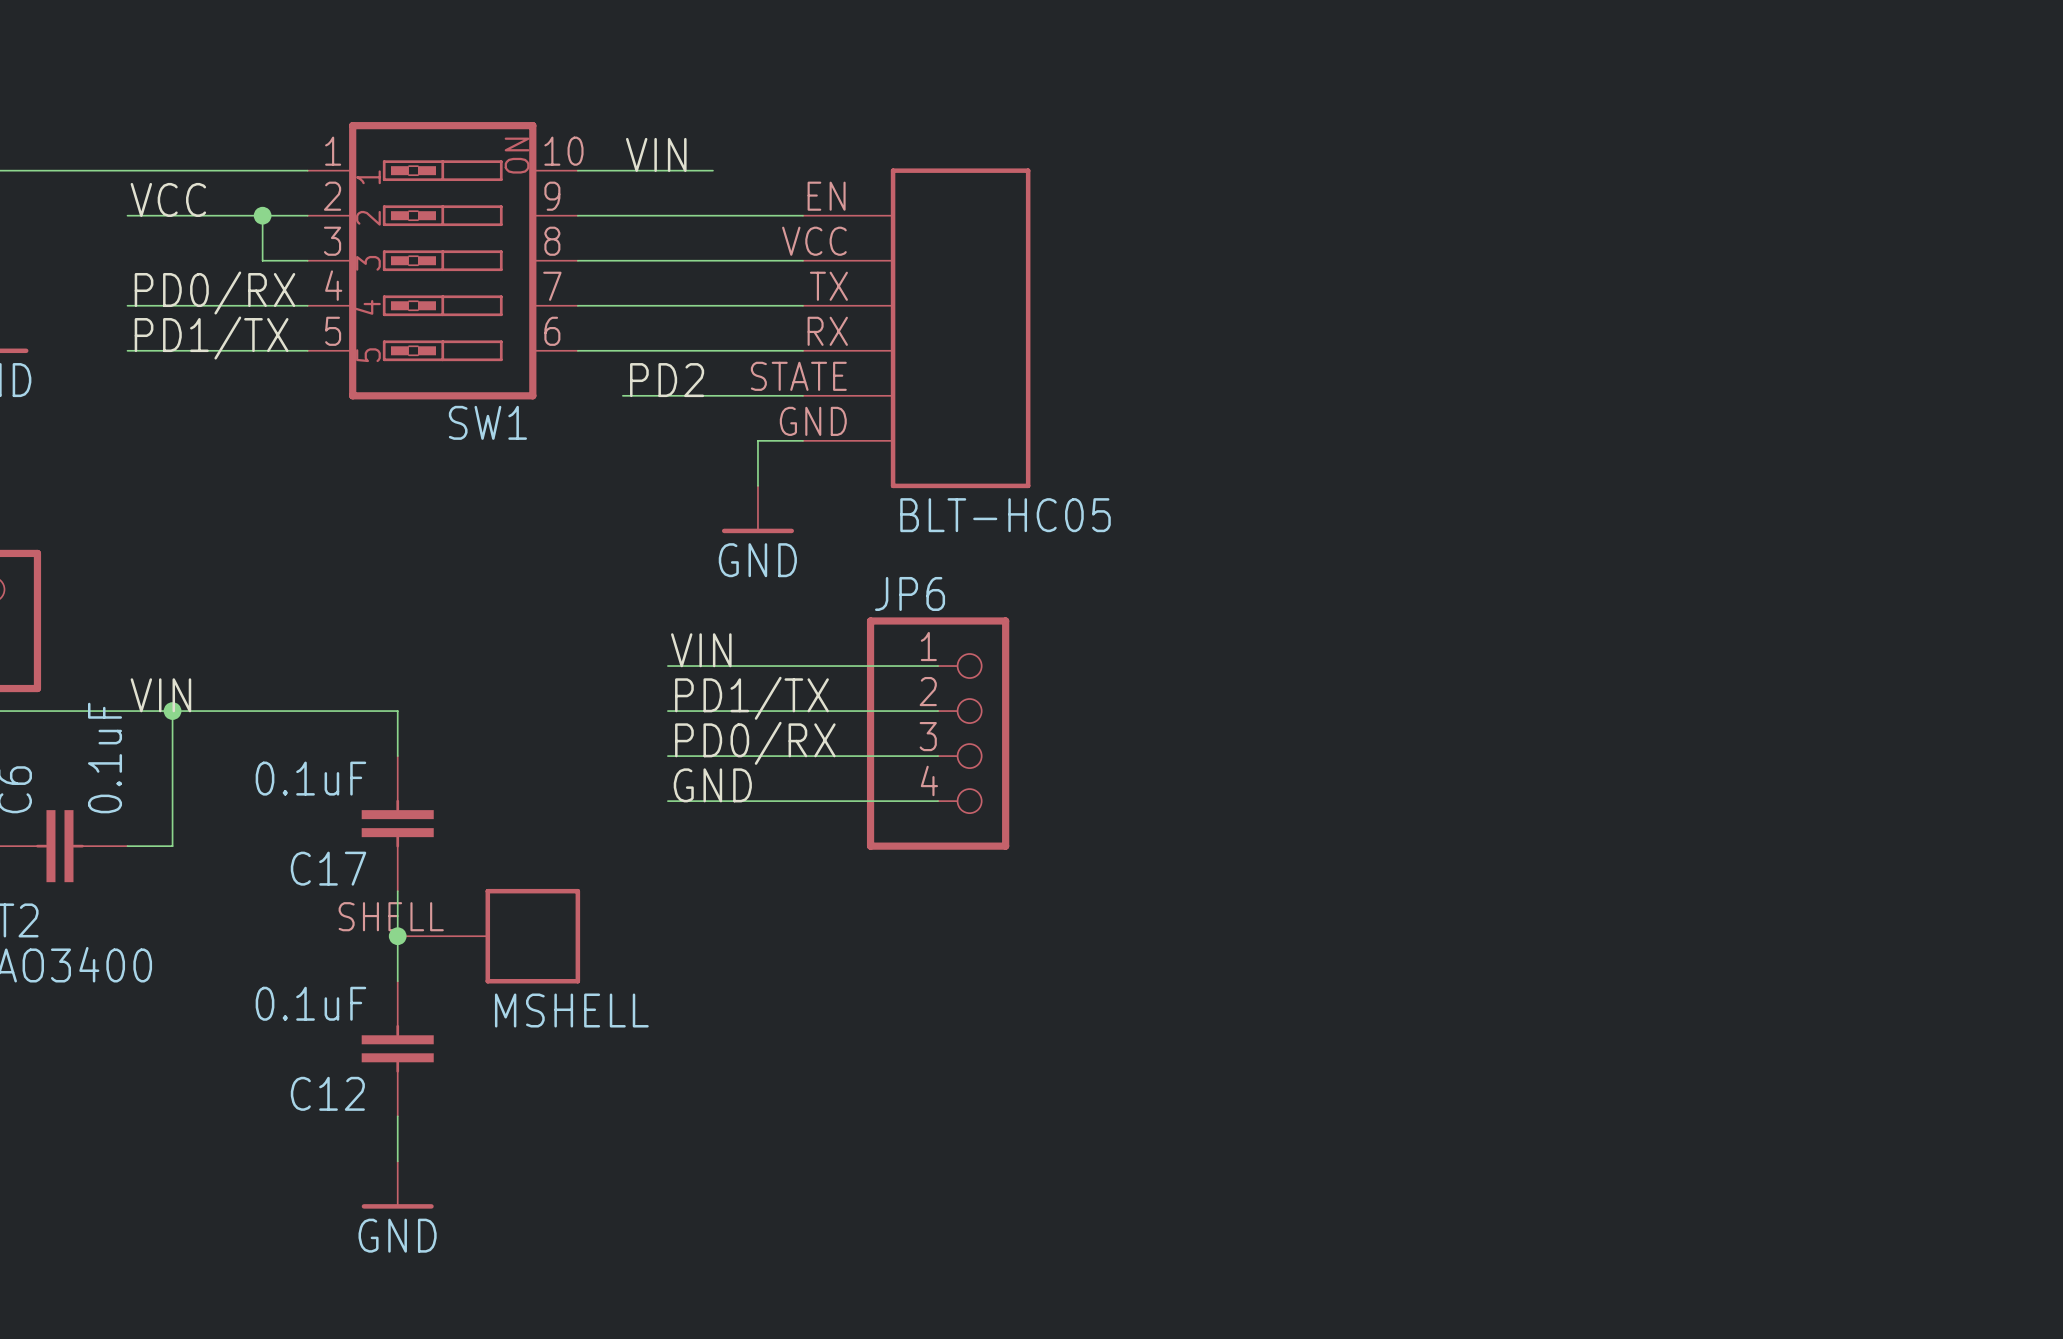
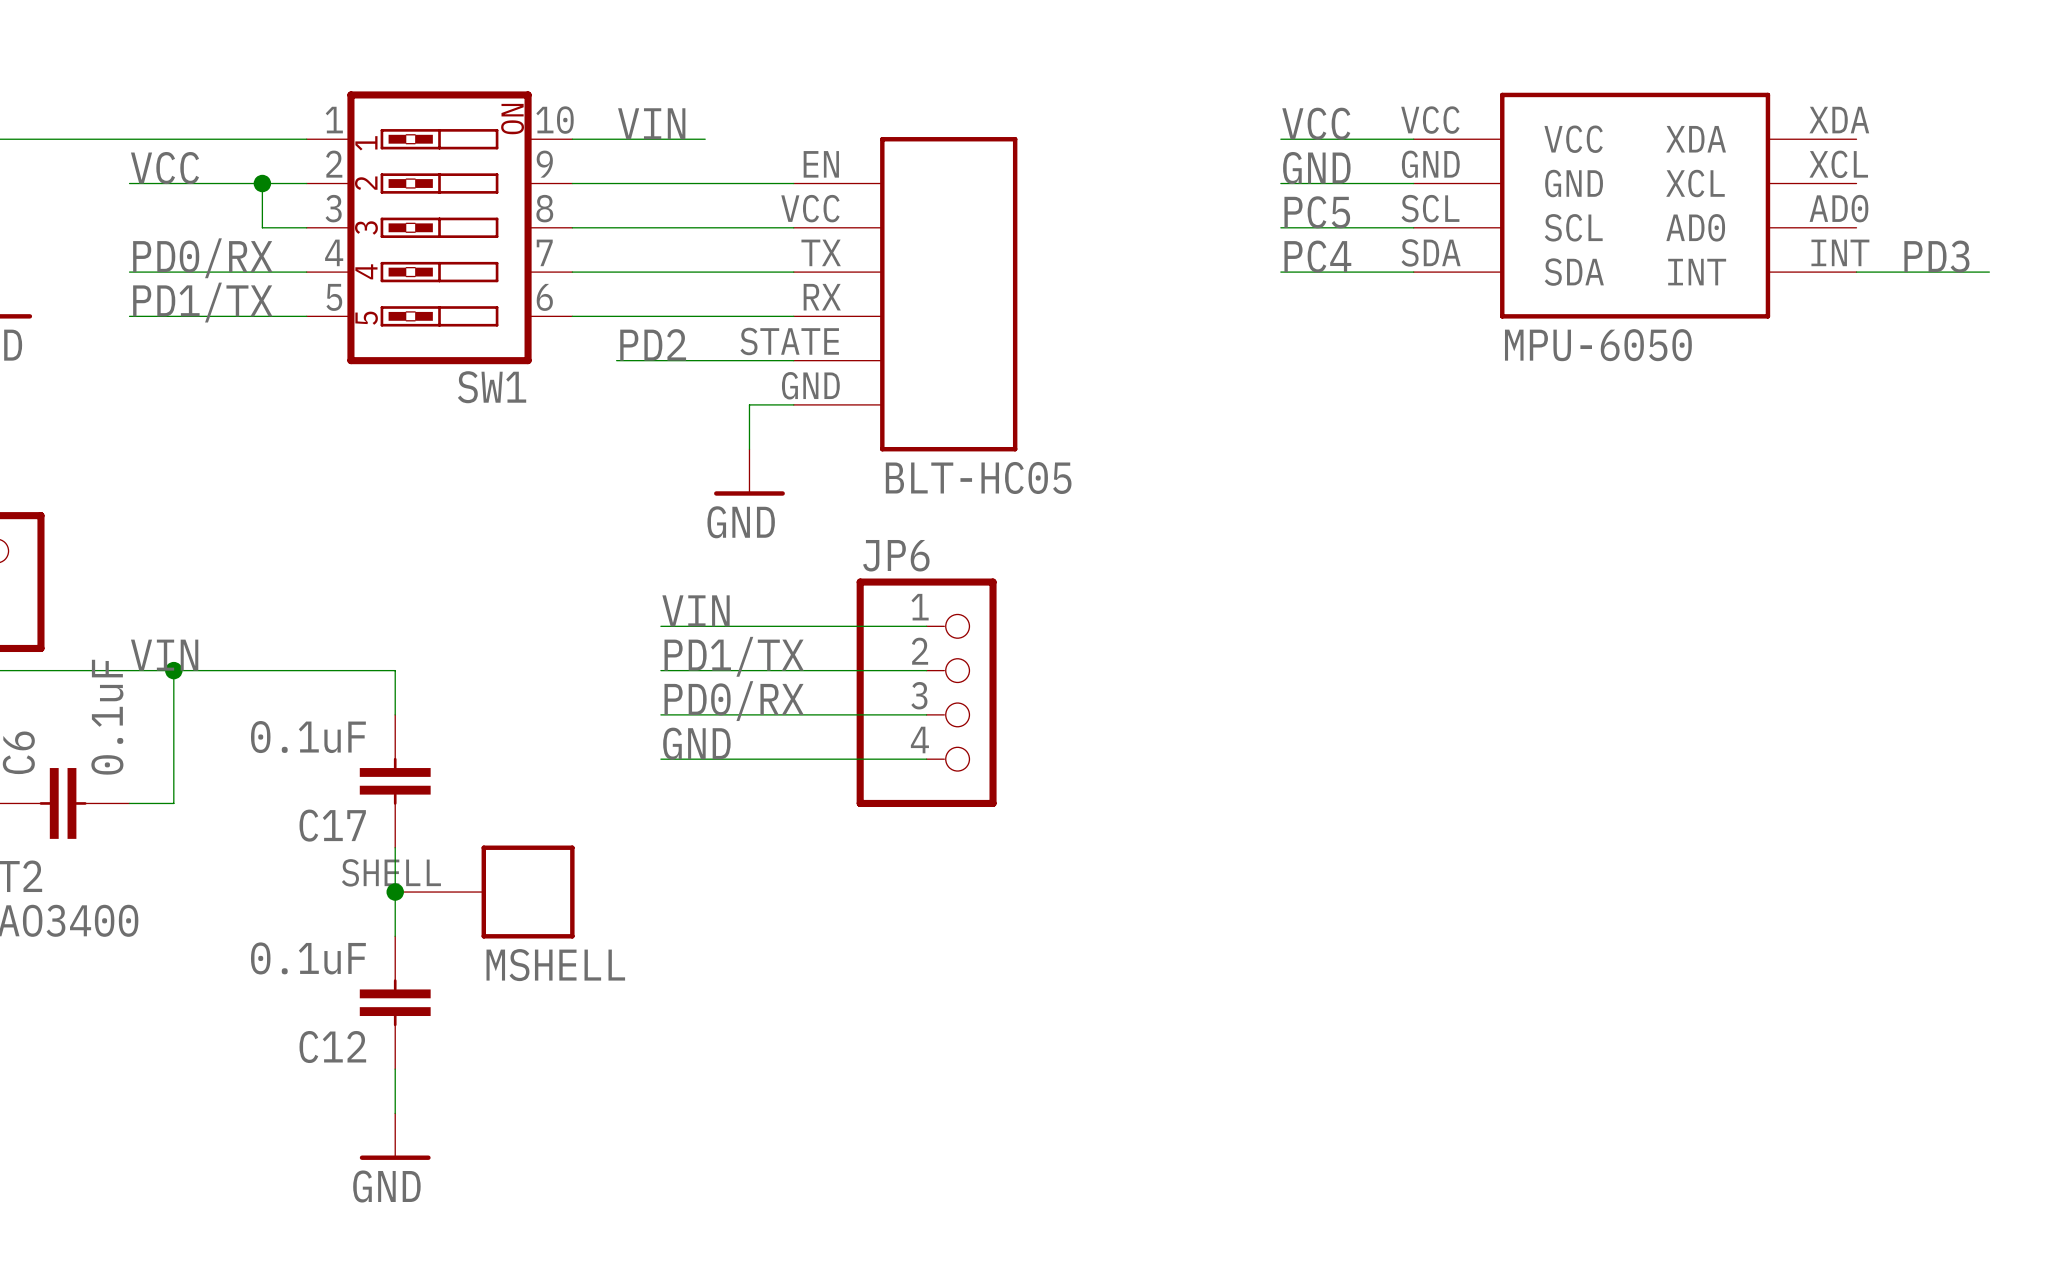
label: none -> VCC (1316, 123)
wire: none -> (1280, 139) (1413, 139)
label: none -> GND (1316, 168)
wire: none -> (1280, 183) (1413, 183)
part: none -> (1635, 205)
label: none -> PC5 (1317, 212)
wire: none -> (1280, 227) (1413, 227)
label: none -> PC4 (1317, 256)
label: none -> PD3 (1936, 256)
wire: none -> (1280, 272) (1413, 272)
wire: none -> (1856, 272) (1989, 272)

